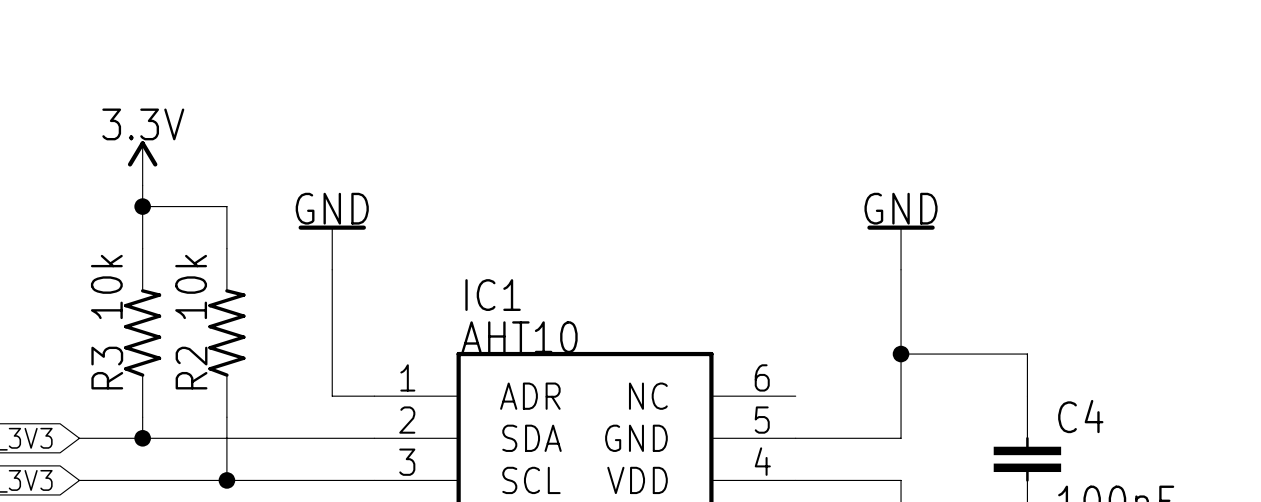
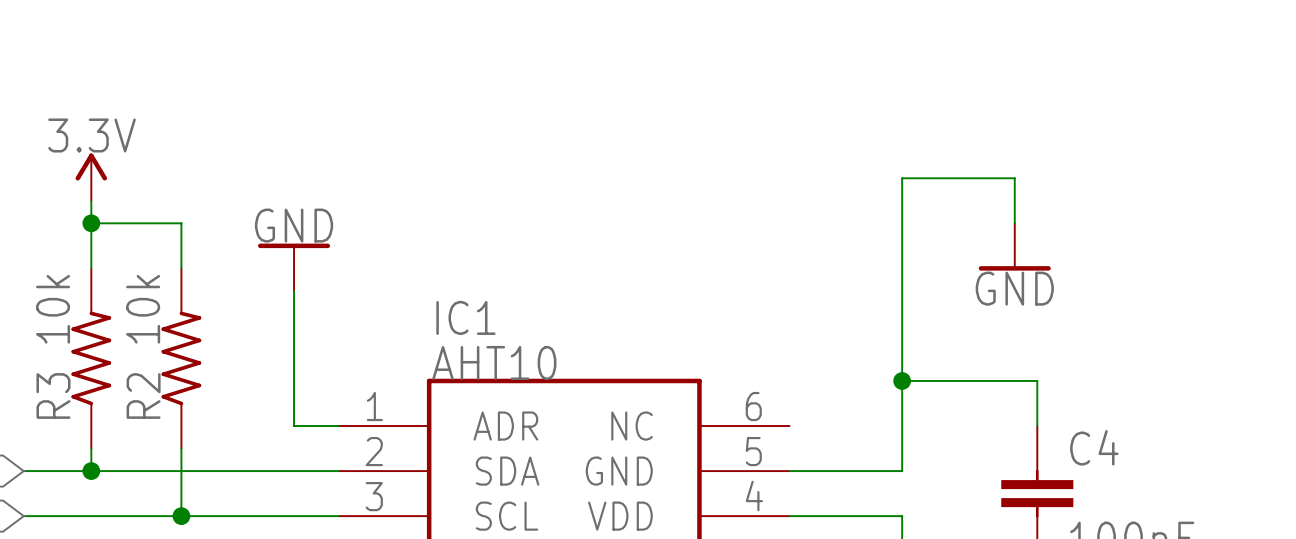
wire: none -> (1014, 223) (1014, 178) (902, 178) (902, 290)
power symbol rotation: 0° (901, 227) -> 180° (1014, 268)
power symbol position: GND (901, 247) -> GND (1014, 246)

